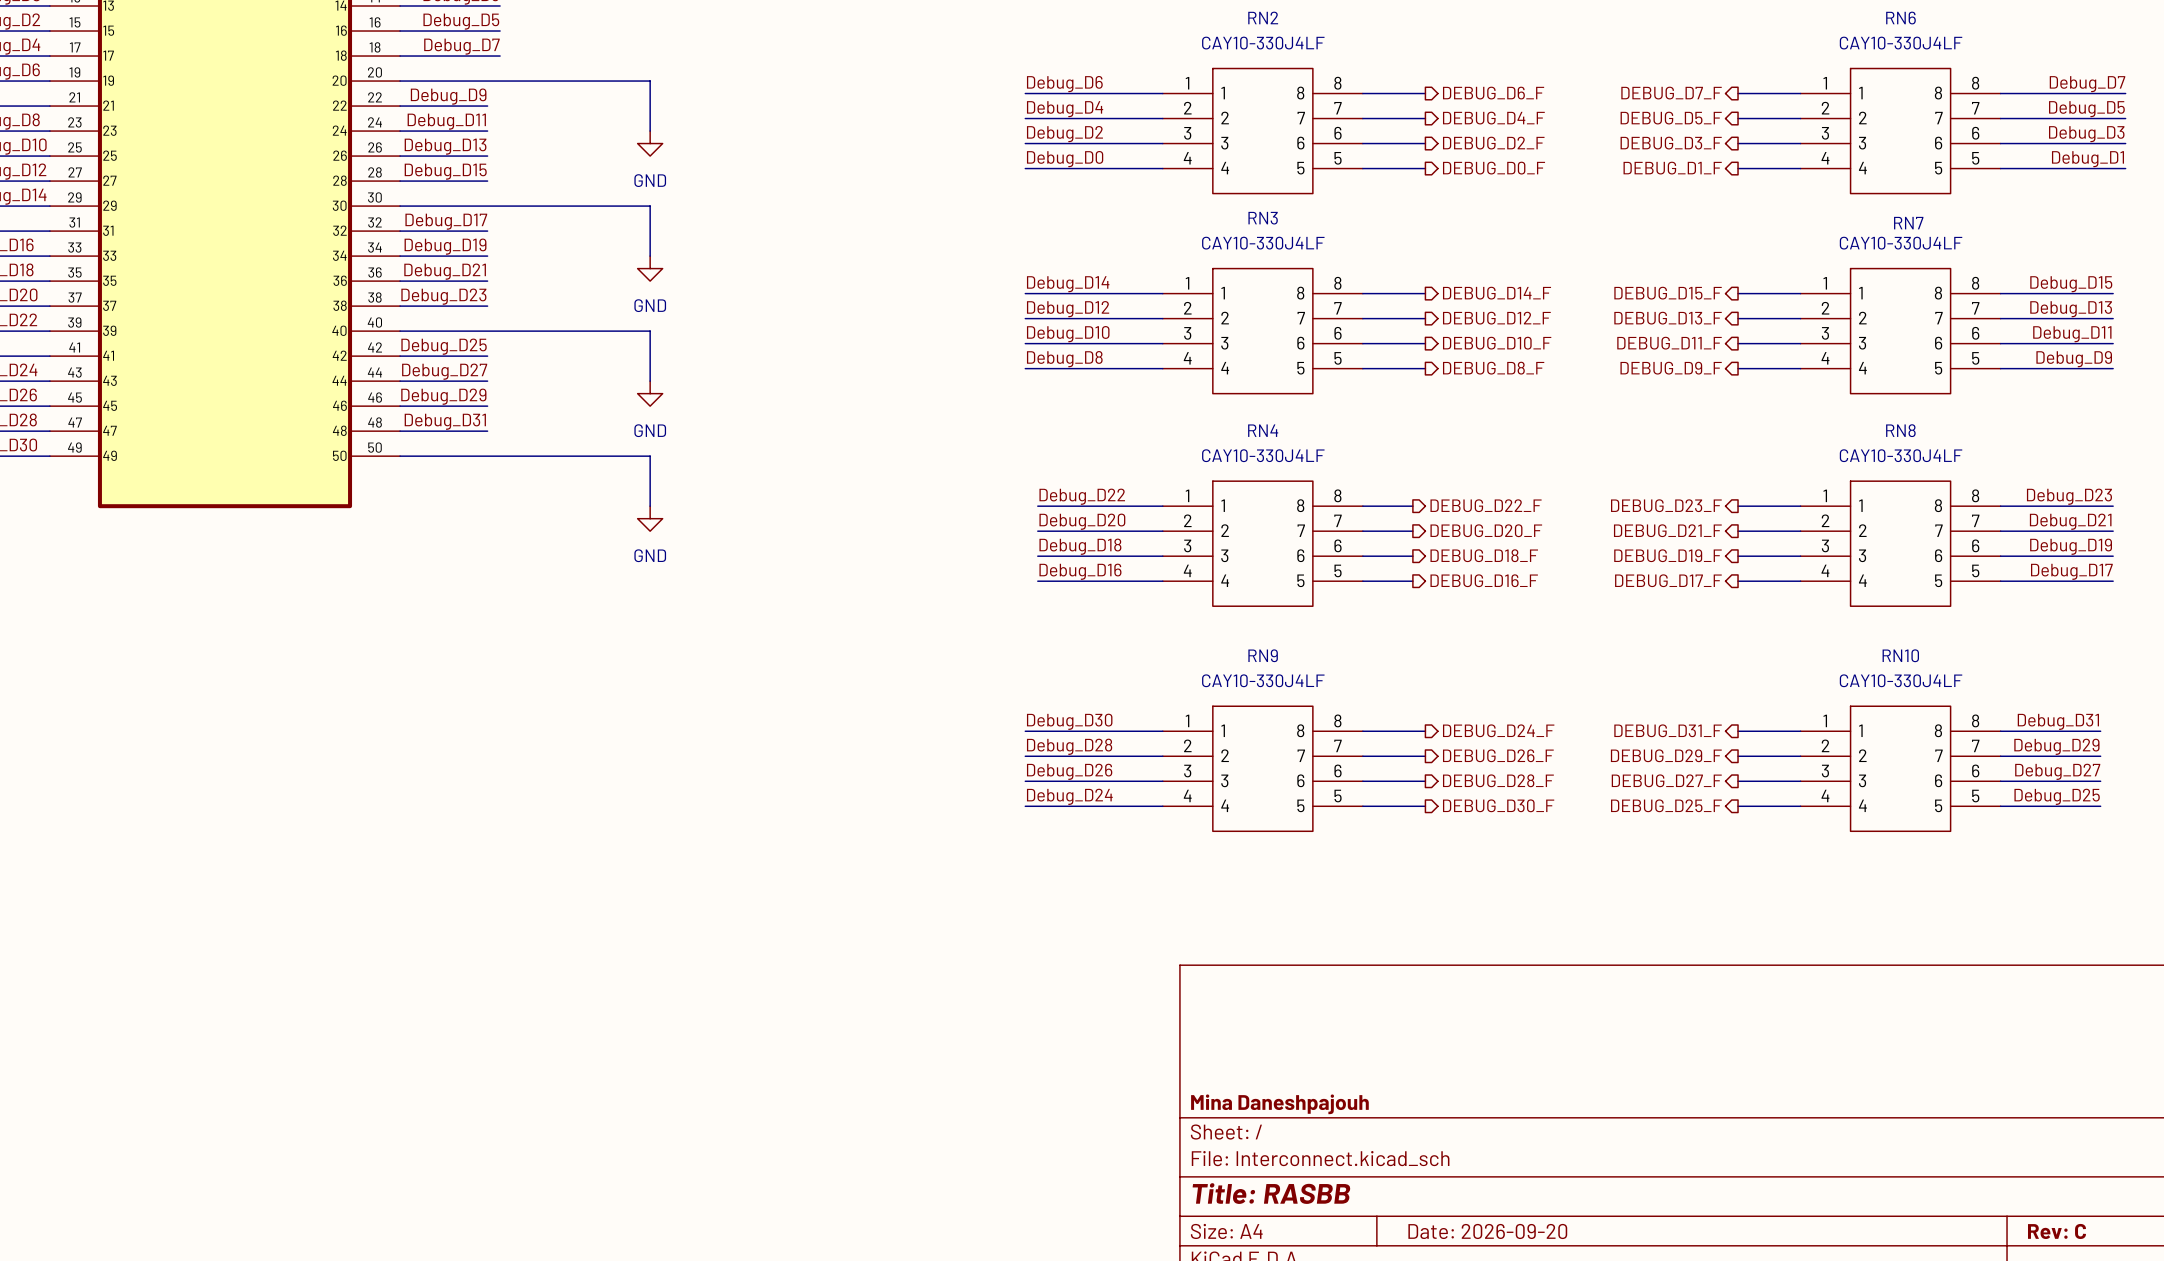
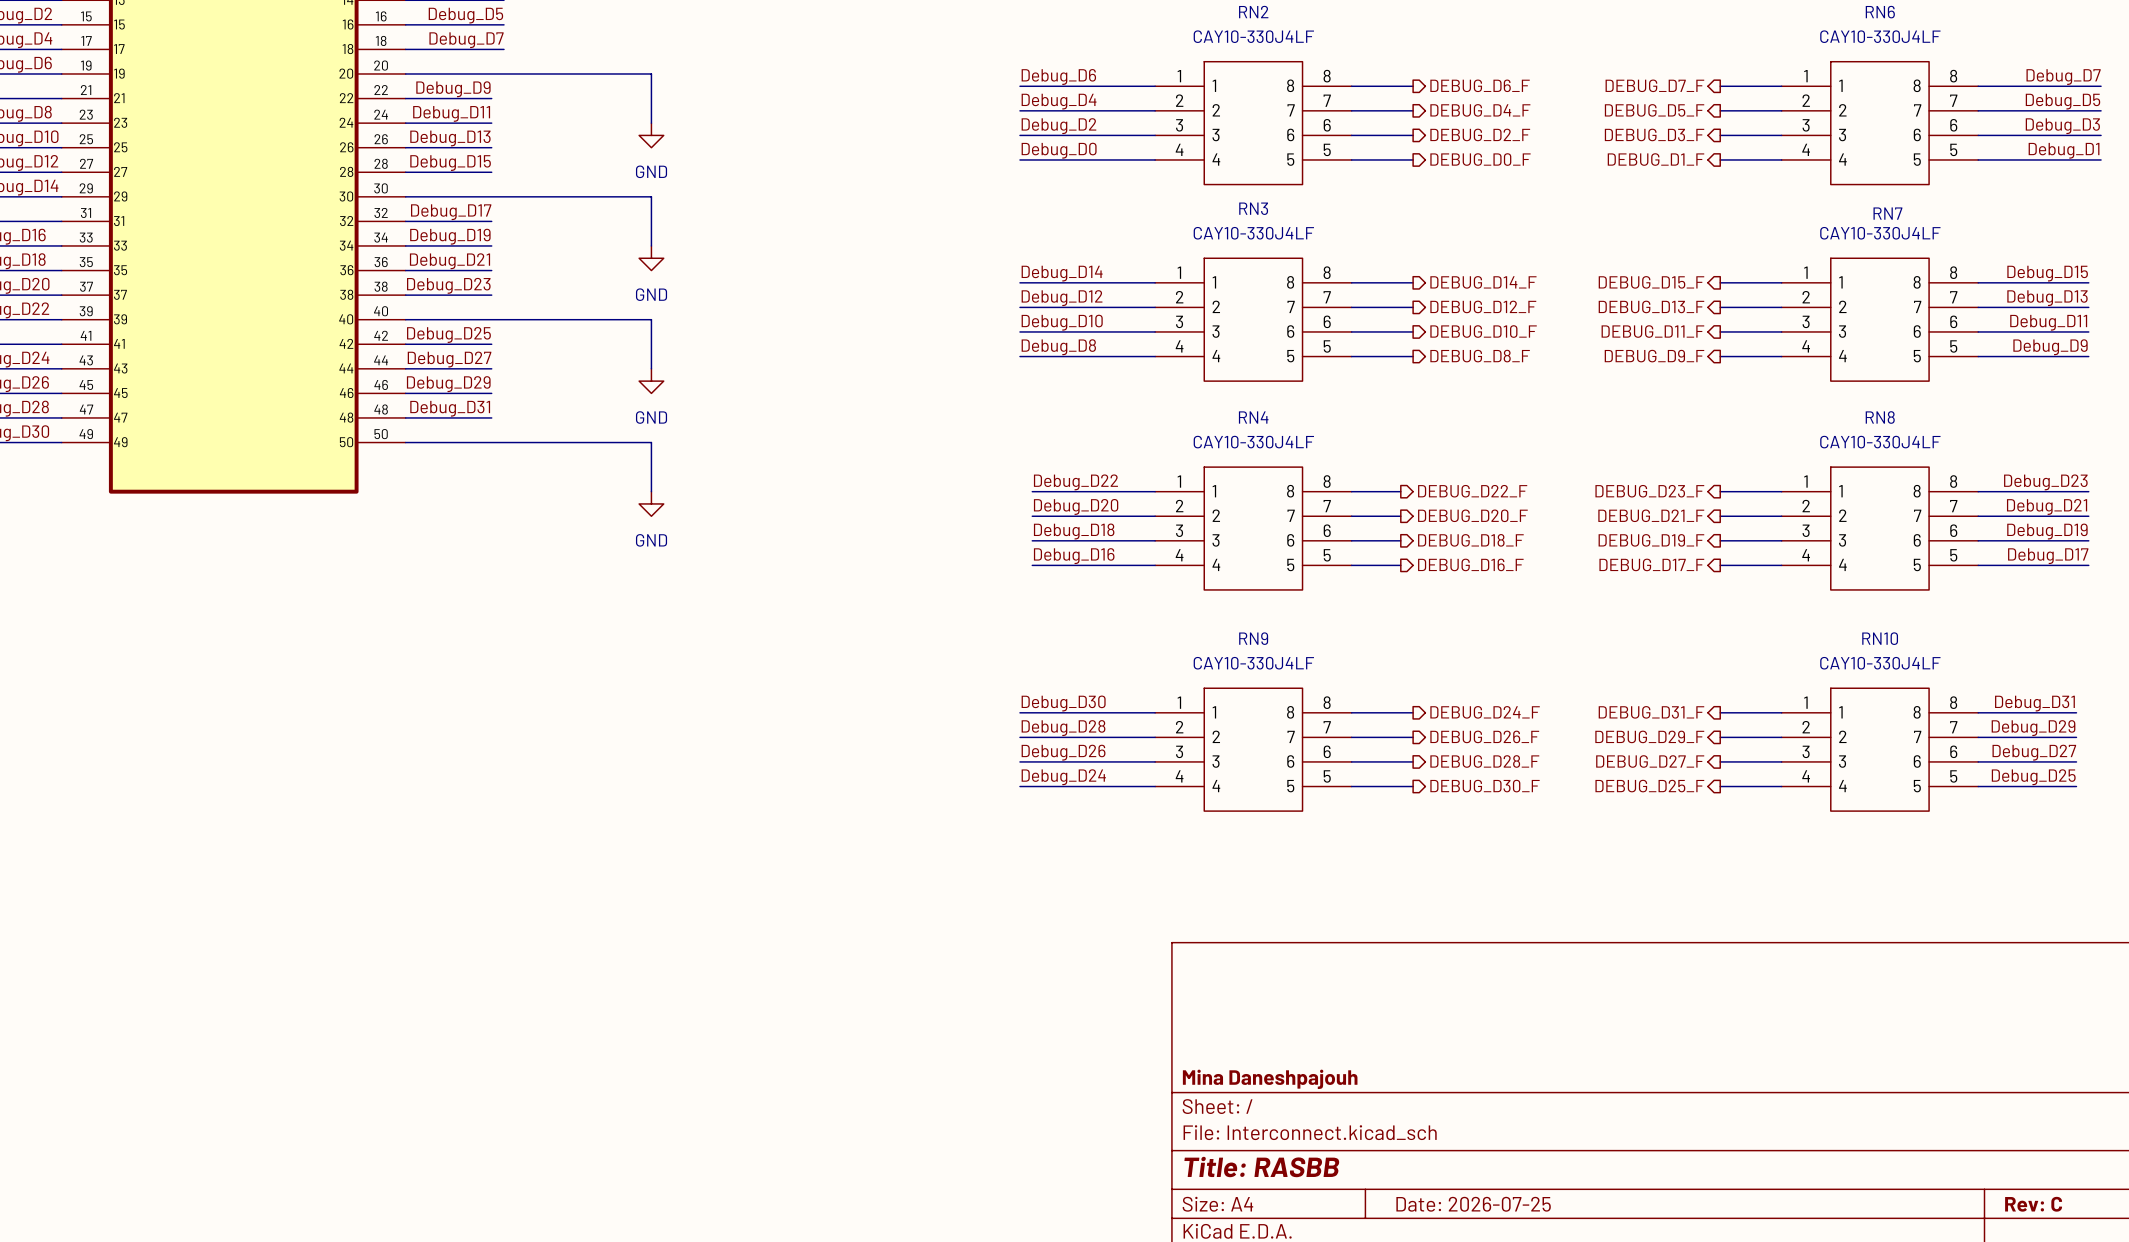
title block: Date: 2026-09-20 (1487, 1231) -> Date: 2026-07-25 (1473, 1204)

